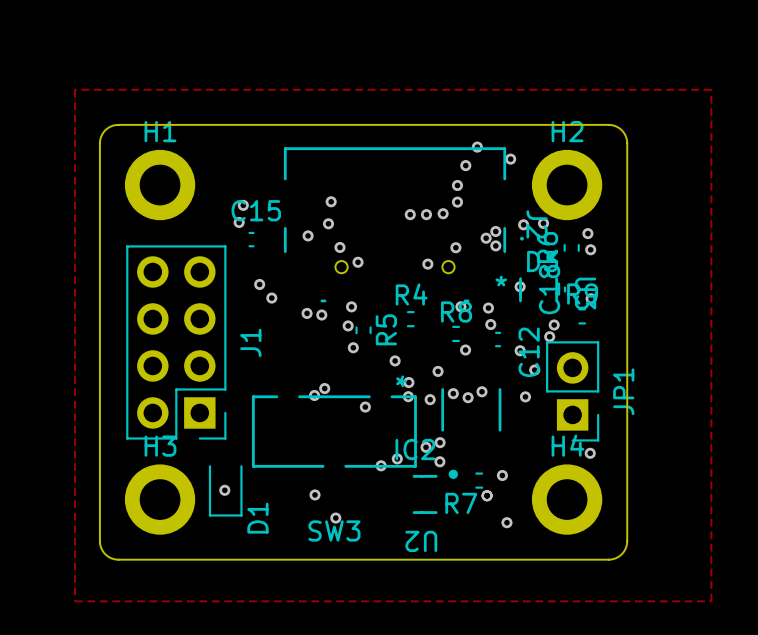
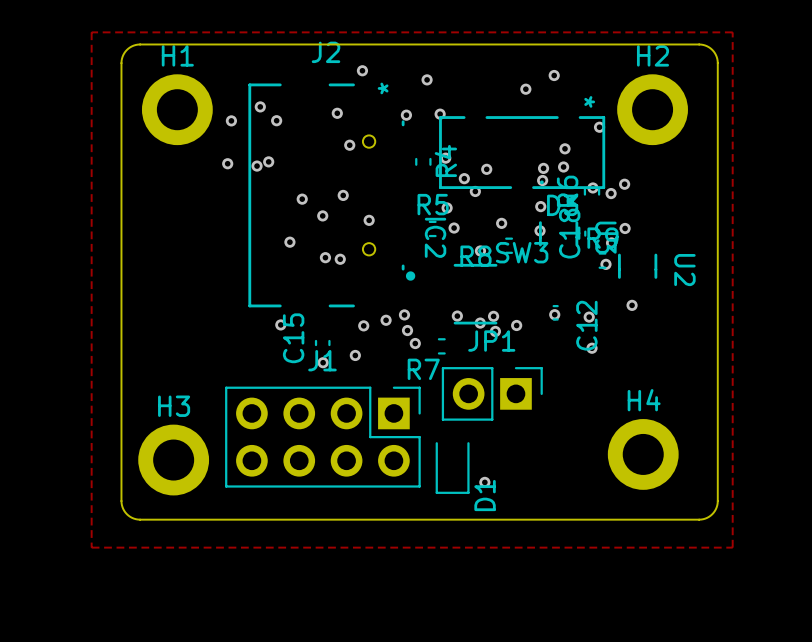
board edge: (118, 124) (608, 124) (620, 128) (625, 135) (627, 143) (627, 541) (623, 552) (616, 557) (608, 559) (118, 559) (106, 555) (101, 549) (99, 541) (99, 143) (105, 130) (118, 124) -> (140, 44) (126, 49) (121, 63) (121, 501) (123, 509) (128, 515) (140, 519) (699, 519) (707, 517) (713, 512) (717, 501) (717, 63) (715, 55) (710, 48) (699, 44) (140, 44)
via: none -> (362, 70)
via: none -> (554, 75)
via: none -> (427, 79)
via: (477, 147) -> none
via position: (510, 159) -> (525, 89)
via: none -> (260, 106)
via: (465, 165) -> none
via: none -> (337, 113)
via: none -> (440, 114)
via: none -> (406, 115)
via: none -> (231, 120)
via: none -> (276, 120)
via: none -> (599, 127)
H1 position: (160, 185) -> (177, 109)
via: (457, 185) -> none
H2 position: (567, 185) -> (652, 109)
via: (457, 202) -> none
via position: (243, 205) -> (268, 161)
via: none -> (564, 148)
C15 name position: C15 (256, 210) -> C15 (293, 338)
via: (443, 213) -> none
via: (410, 214) -> none
via: none -> (227, 163)
via: (328, 223) -> none
J2 rotation: 0° (395, 224) -> 90° counterclockwise (326, 195)
via: none -> (486, 169)
via: (495, 231) -> none
via: (587, 233) -> none
via: none -> (464, 178)
via: (308, 235) -> none
via: none -> (542, 180)
via: (486, 238) -> none
C15 rotation: 0° (251, 239) -> 90° clockwise (322, 343)
C15 position: (251, 239) -> (322, 343)
via: none -> (624, 184)
via: none -> (592, 187)
via: (495, 245) -> none
via: (339, 247) -> none
via: none -> (343, 195)
via: none -> (302, 199)
via: (358, 262) -> none
via: none -> (540, 206)
via: none -> (322, 215)
via: none -> (369, 220)
via: none -> (501, 223)
via: (259, 284) -> none
via: none -> (454, 228)
via: none -> (625, 228)
via: (351, 306) -> none
via: (488, 308) -> none
R4 rotation: 0° (410, 319) -> 90° clockwise (423, 161)
R4 position: (410, 319) -> (423, 161)
via: none -> (605, 264)
via: (490, 324) -> none
via: (348, 325) -> none
via: (554, 325) -> none
R5 rotation: 0° (363, 330) -> 90° clockwise (432, 228)
R5 position: (363, 330) -> (432, 228)
R8 position: (456, 333) -> (509, 245)
via: (549, 336) -> none
C12 position: (498, 339) -> (555, 312)
J1 rotation: 0° (176, 342) -> 90° counterclockwise (322, 437)
J1 position: (176, 342) -> (322, 437)
via: (353, 347) -> none
via: (465, 350) -> none
via: (520, 350) -> none
via position: (395, 360) -> (404, 314)
via: none -> (632, 305)
via: none -> (493, 316)
via: none -> (589, 317)
via: none -> (386, 320)
via: none -> (480, 323)
via: none -> (280, 324)
via: none -> (516, 325)
via: none -> (363, 325)
via: (408, 382) -> none
via: none -> (407, 330)
via: none -> (495, 331)
via: (324, 388) -> none
via: (481, 391) -> none
JP1 rotation: 0° (572, 391) -> 90° counterclockwise (492, 393)
JP1 position: (572, 391) -> (492, 393)
via: (453, 393) -> none
via: (314, 395) -> none
via: (408, 396) -> none
via: (525, 396) -> none
via: (468, 397) -> none
via: none -> (415, 343)
via: (430, 399) -> none
via: none -> (592, 348)
via: (365, 407) -> none
via: none -> (355, 355)
via: none -> (323, 362)
SW3 position: (334, 431) -> (522, 152)
IC2 rotation: 0° (471, 433) -> 90° clockwise (451, 294)
IC2 position: (471, 433) -> (451, 294)
via: (440, 442) -> none
via: (426, 447) -> none
via: (590, 453) -> none
via: (397, 458) -> none
via: (439, 461) -> none
via: (381, 465) -> none
via: (502, 475) -> none
R7 position: (479, 480) -> (441, 346)
via: (224, 490) -> none
D1 position: (225, 490) -> (452, 468)
via: (315, 494) -> none
U2 rotation: 0° (425, 494) -> 90° counterclockwise (637, 266)
U2 position: (425, 494) -> (637, 266)
via: (487, 495) -> none
H3 position: (160, 499) -> (173, 460)
H4 position: (567, 499) -> (643, 454)
via: (335, 518) -> none
via: (506, 522) -> none
via: none -> (484, 482)

